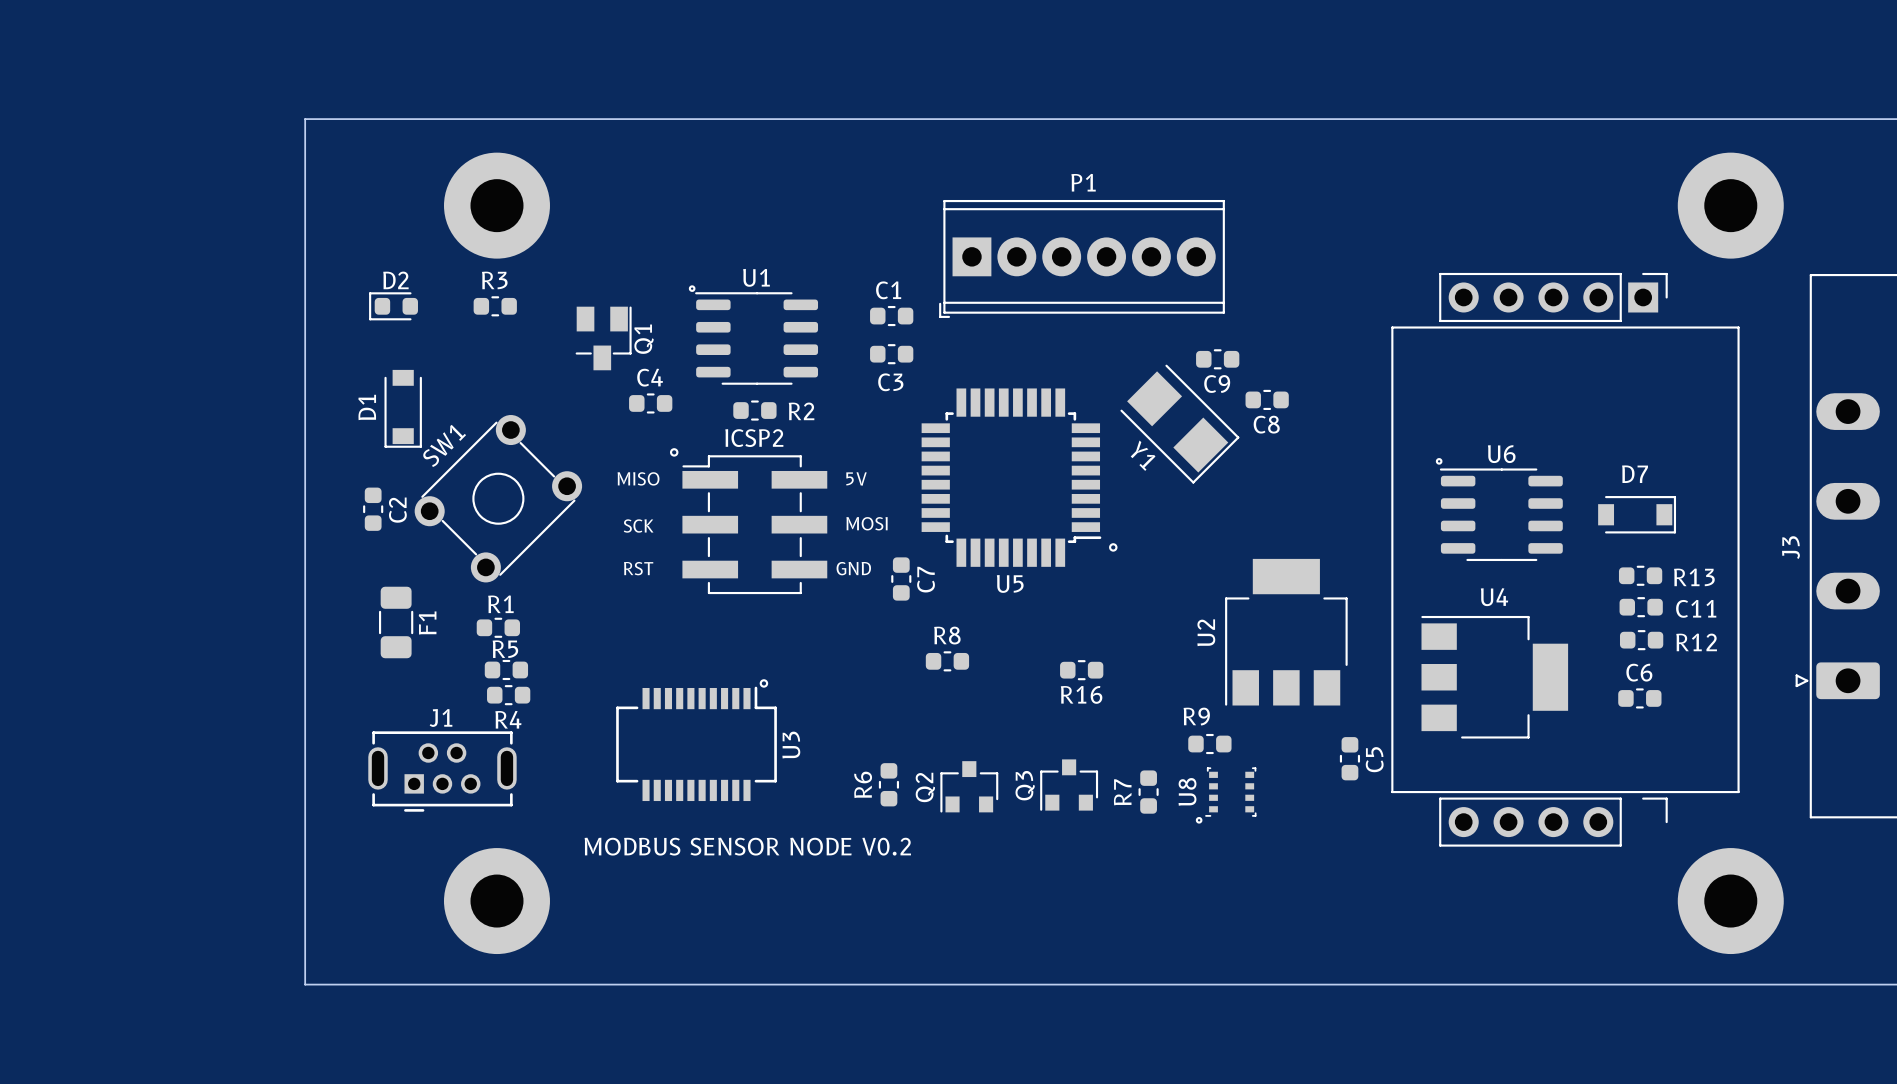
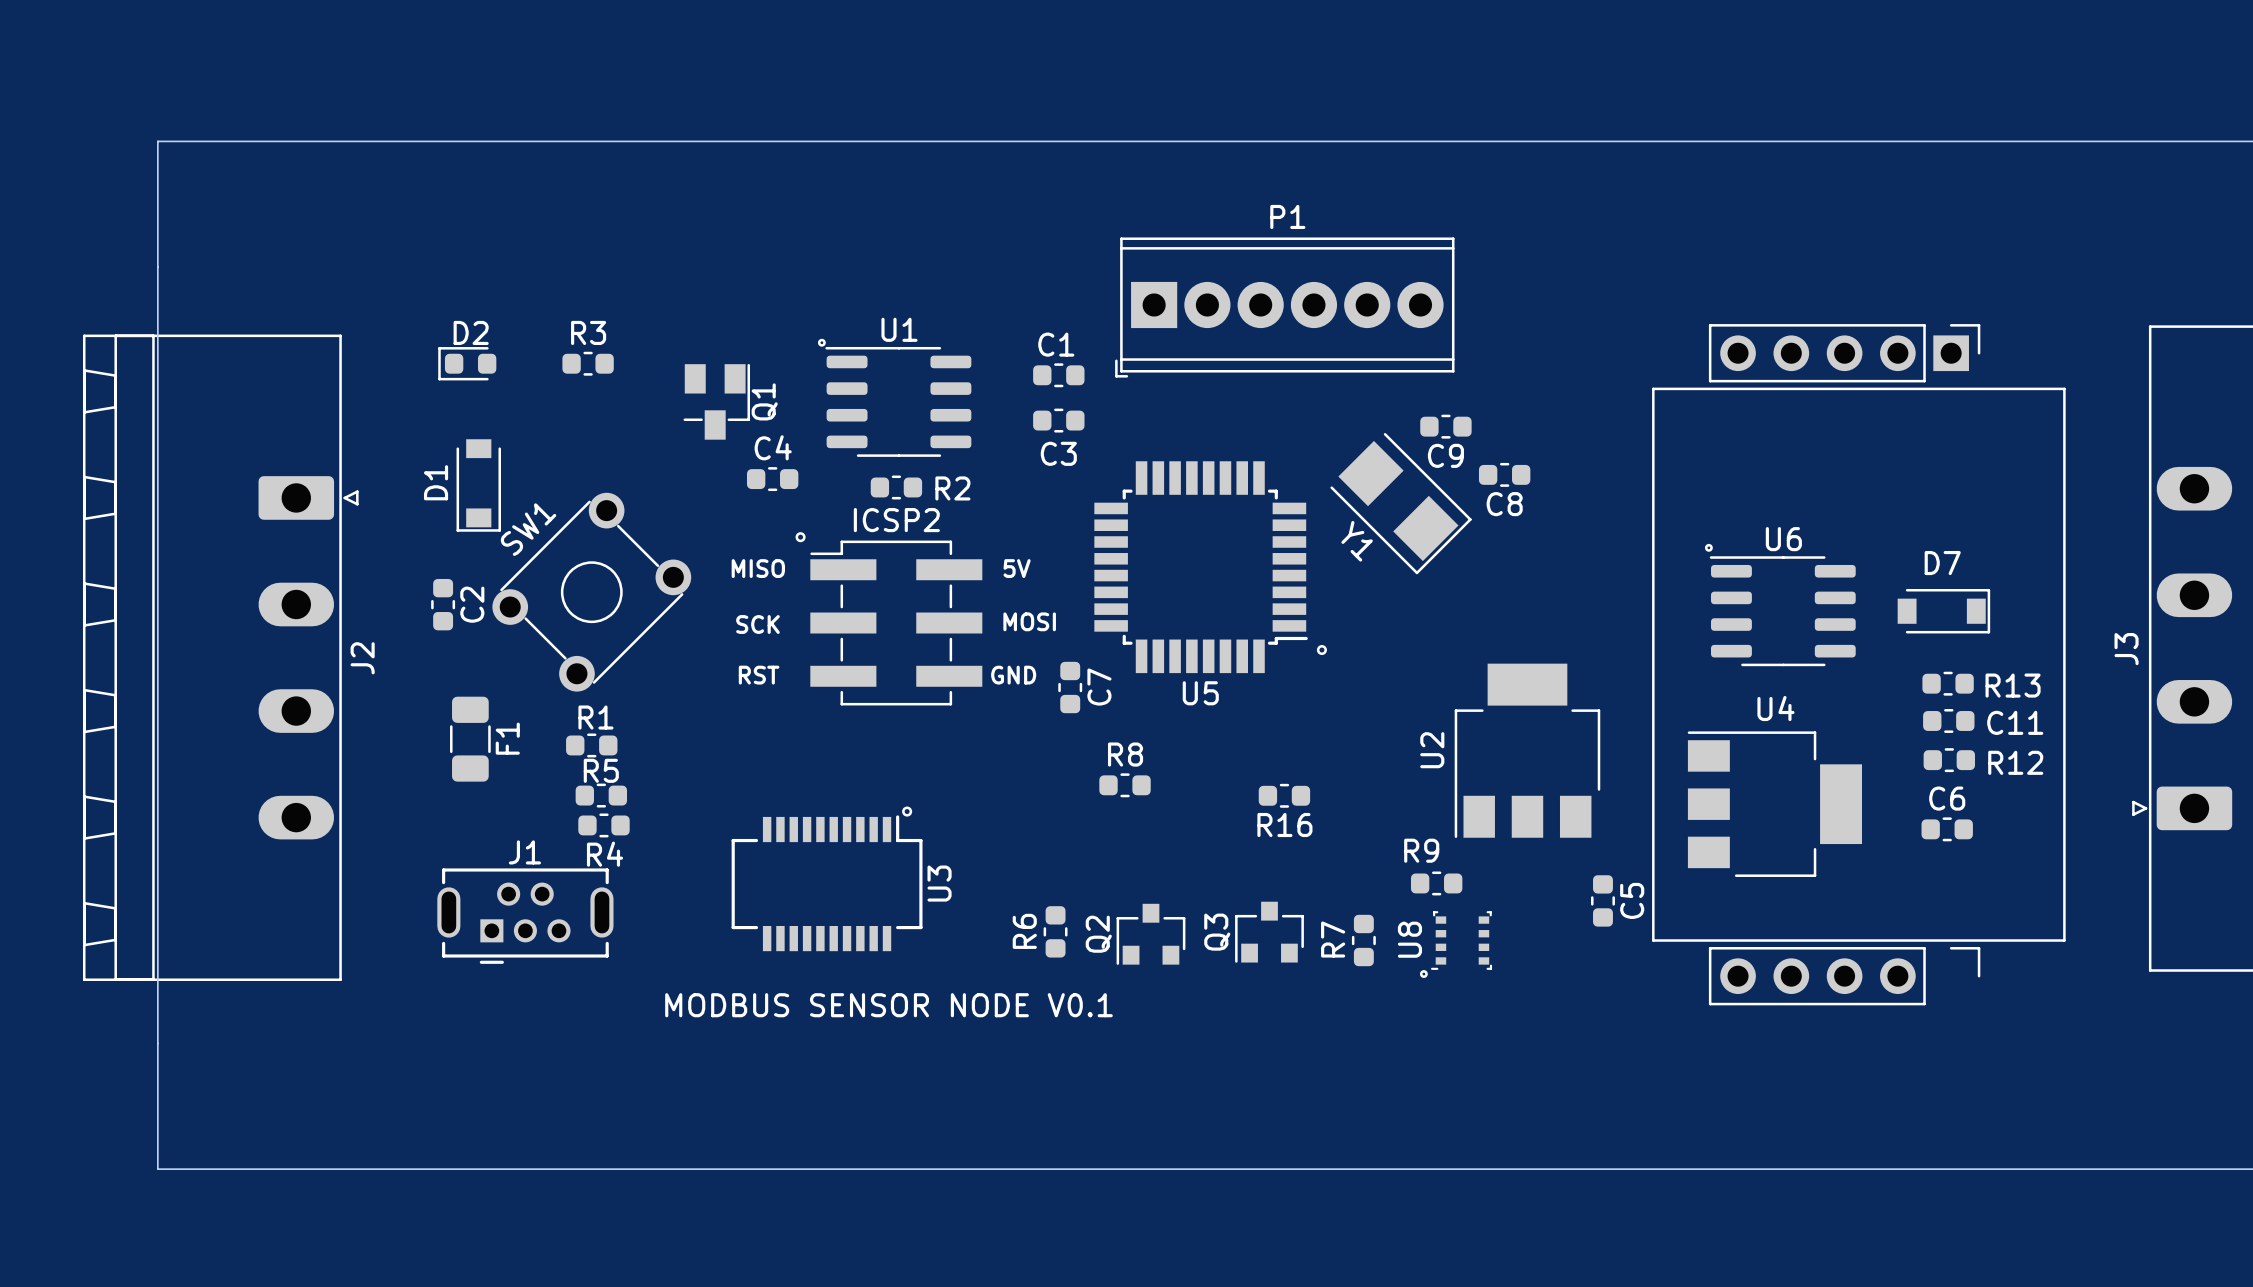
board edge: (305, 119) (305, 984) -> (362, 141) (157, 141) (157, 1169) (362, 1169)
part: (496, 205) -> none
part: (1730, 205) -> none
J2: none -> (220, 657)
text: MODBUS SENSOR NODE V0.2 (747, 846) -> MODBUS SENSOR NODE V0.1 (888, 1005)
part: (496, 901) -> none
part: (1730, 901) -> none

